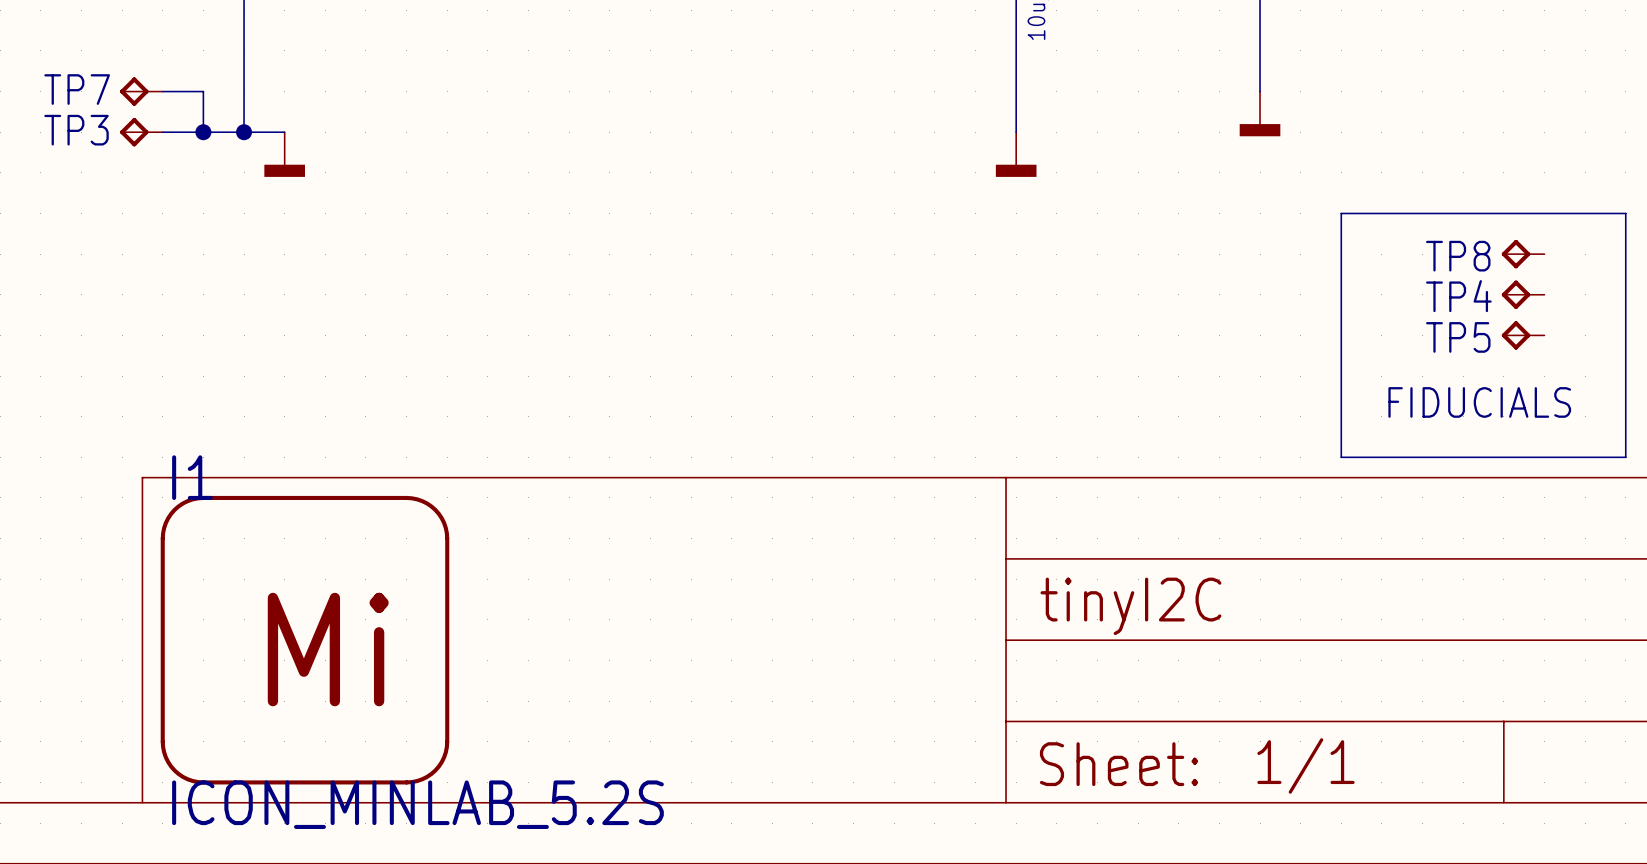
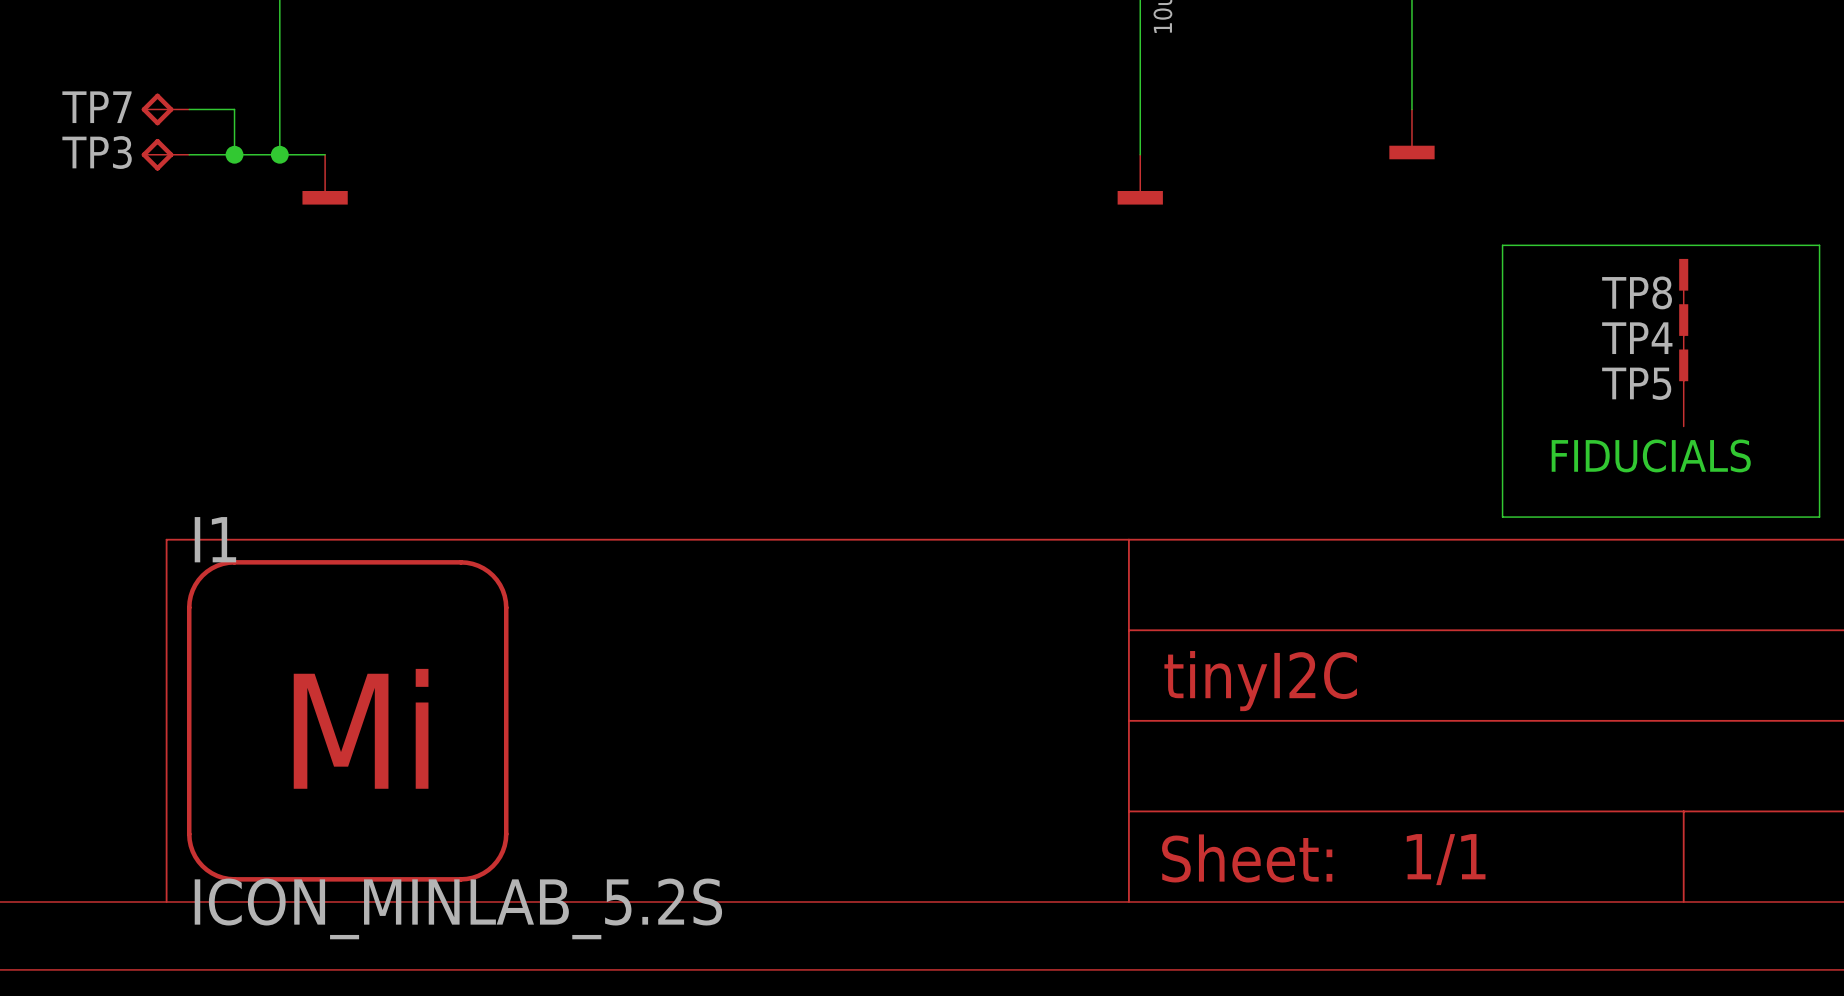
TP8 symbol: [1501, 239, 1545, 269] -> [1679, 258, 1689, 336]
TP4 symbol: [1501, 280, 1545, 309] -> [1679, 304, 1689, 382]
TP5 symbol: [1501, 321, 1545, 350] -> [1679, 349, 1689, 427]

